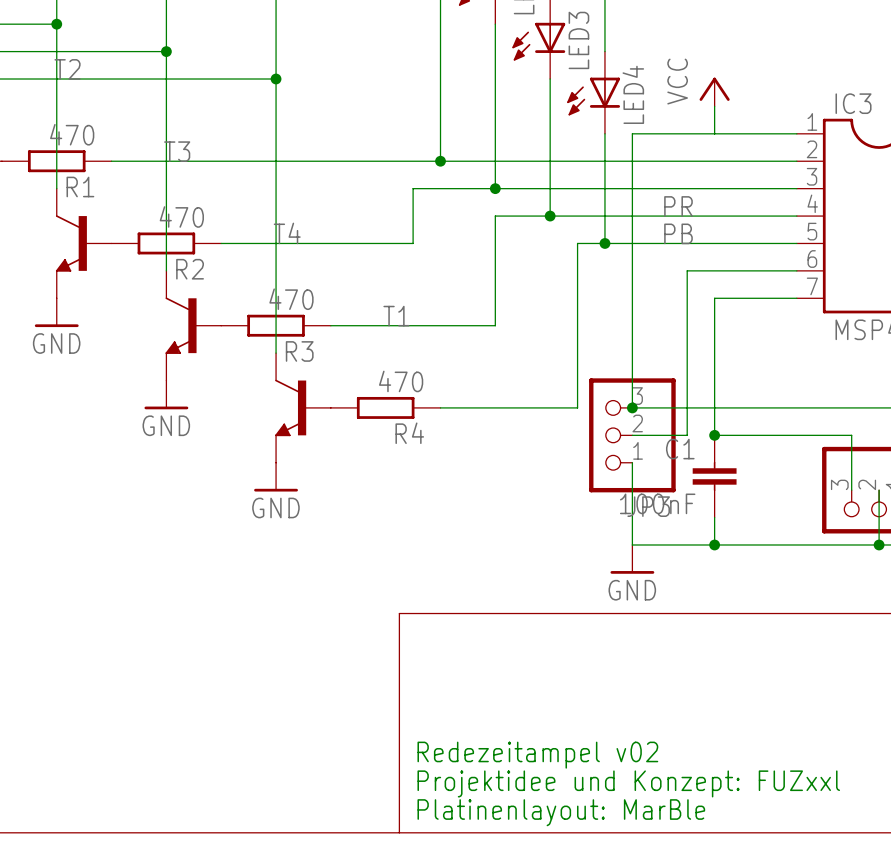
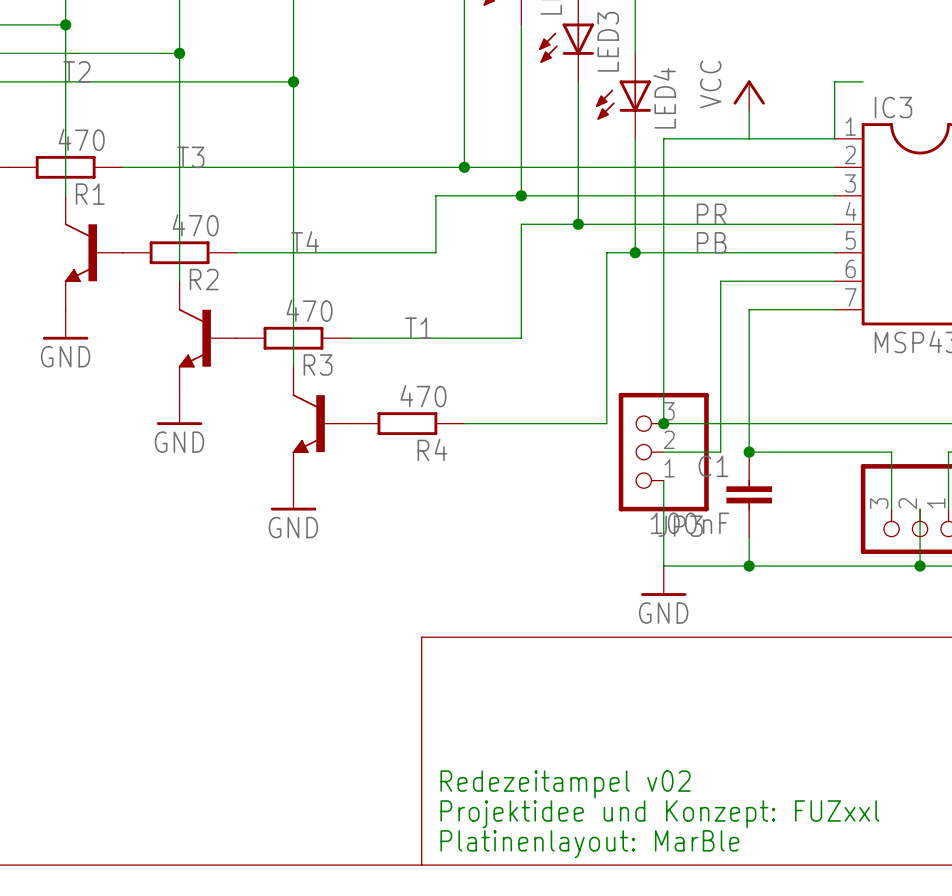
wire: none -> (863, 81) (834, 81) (834, 138)

